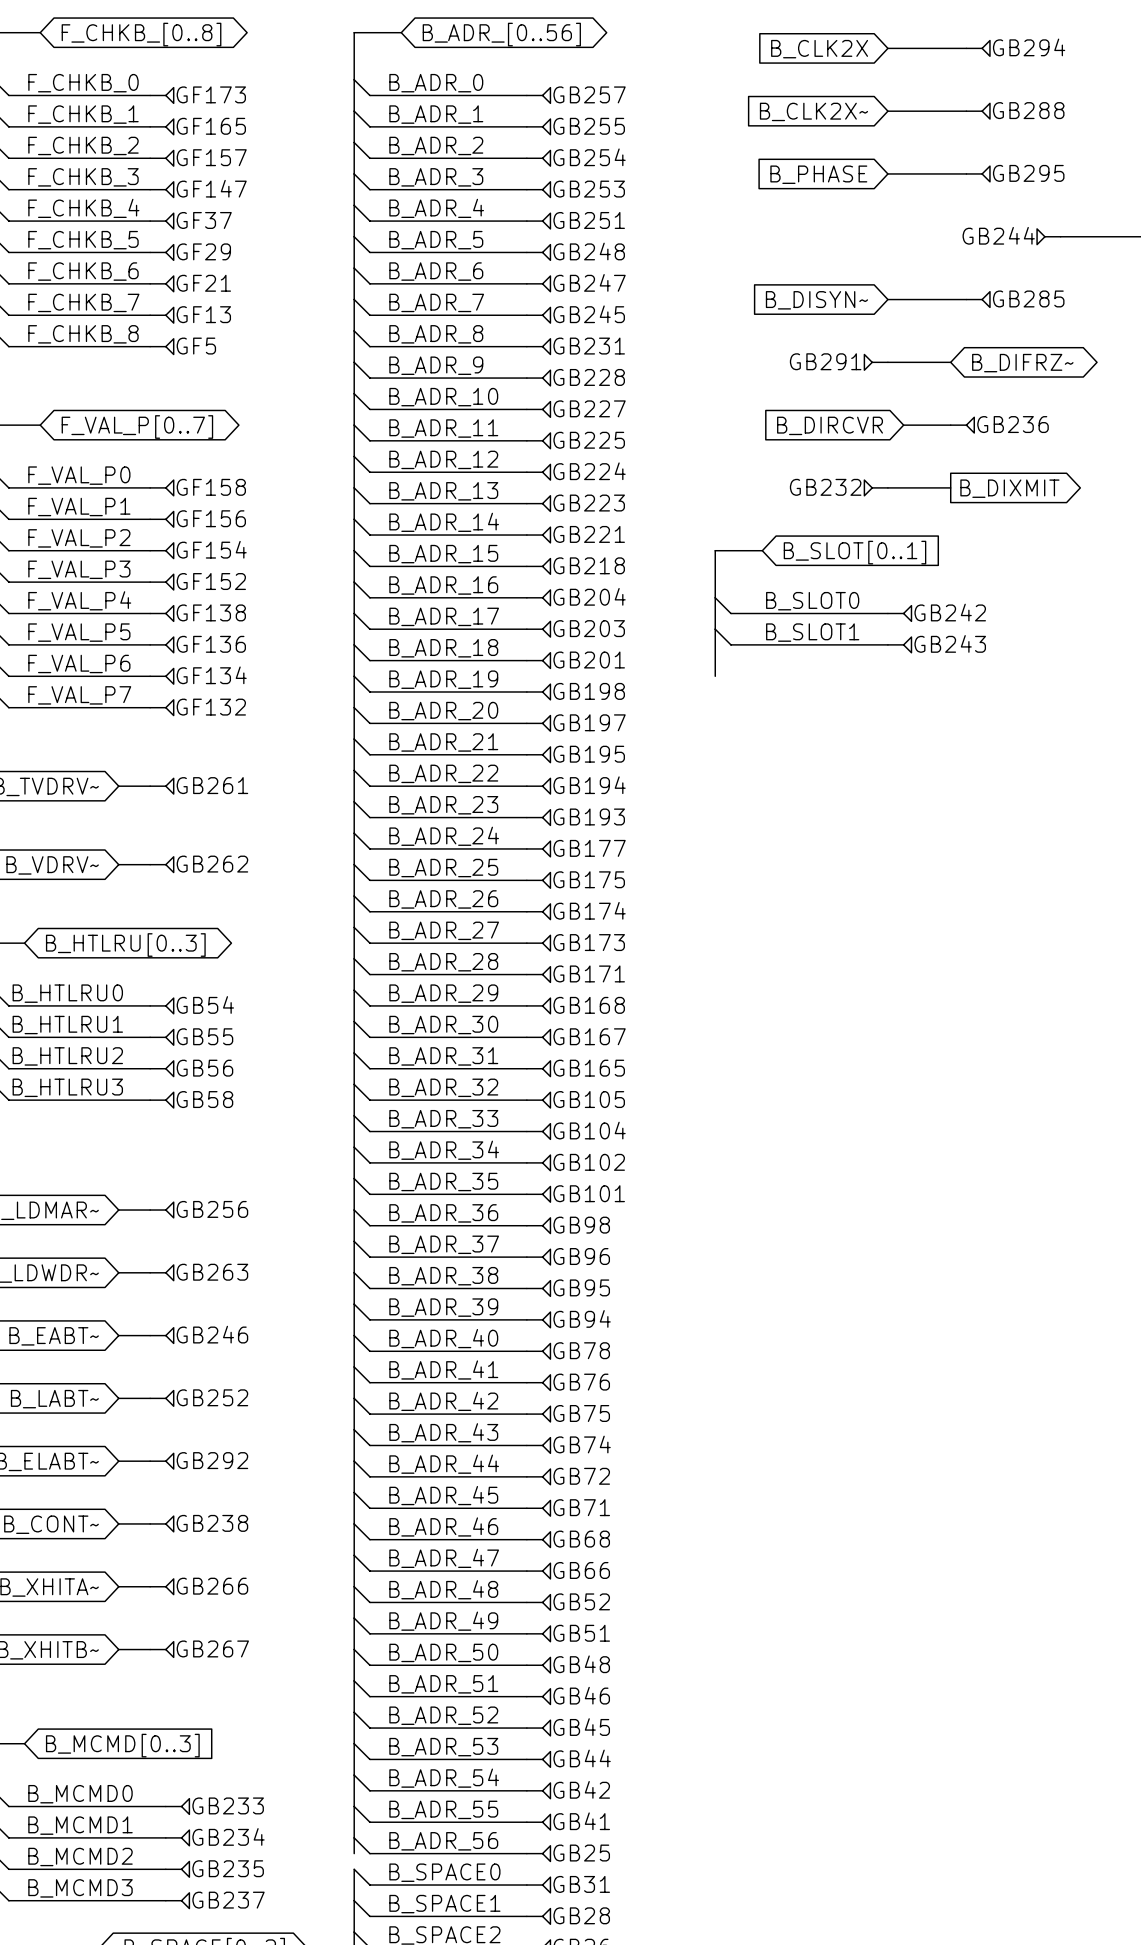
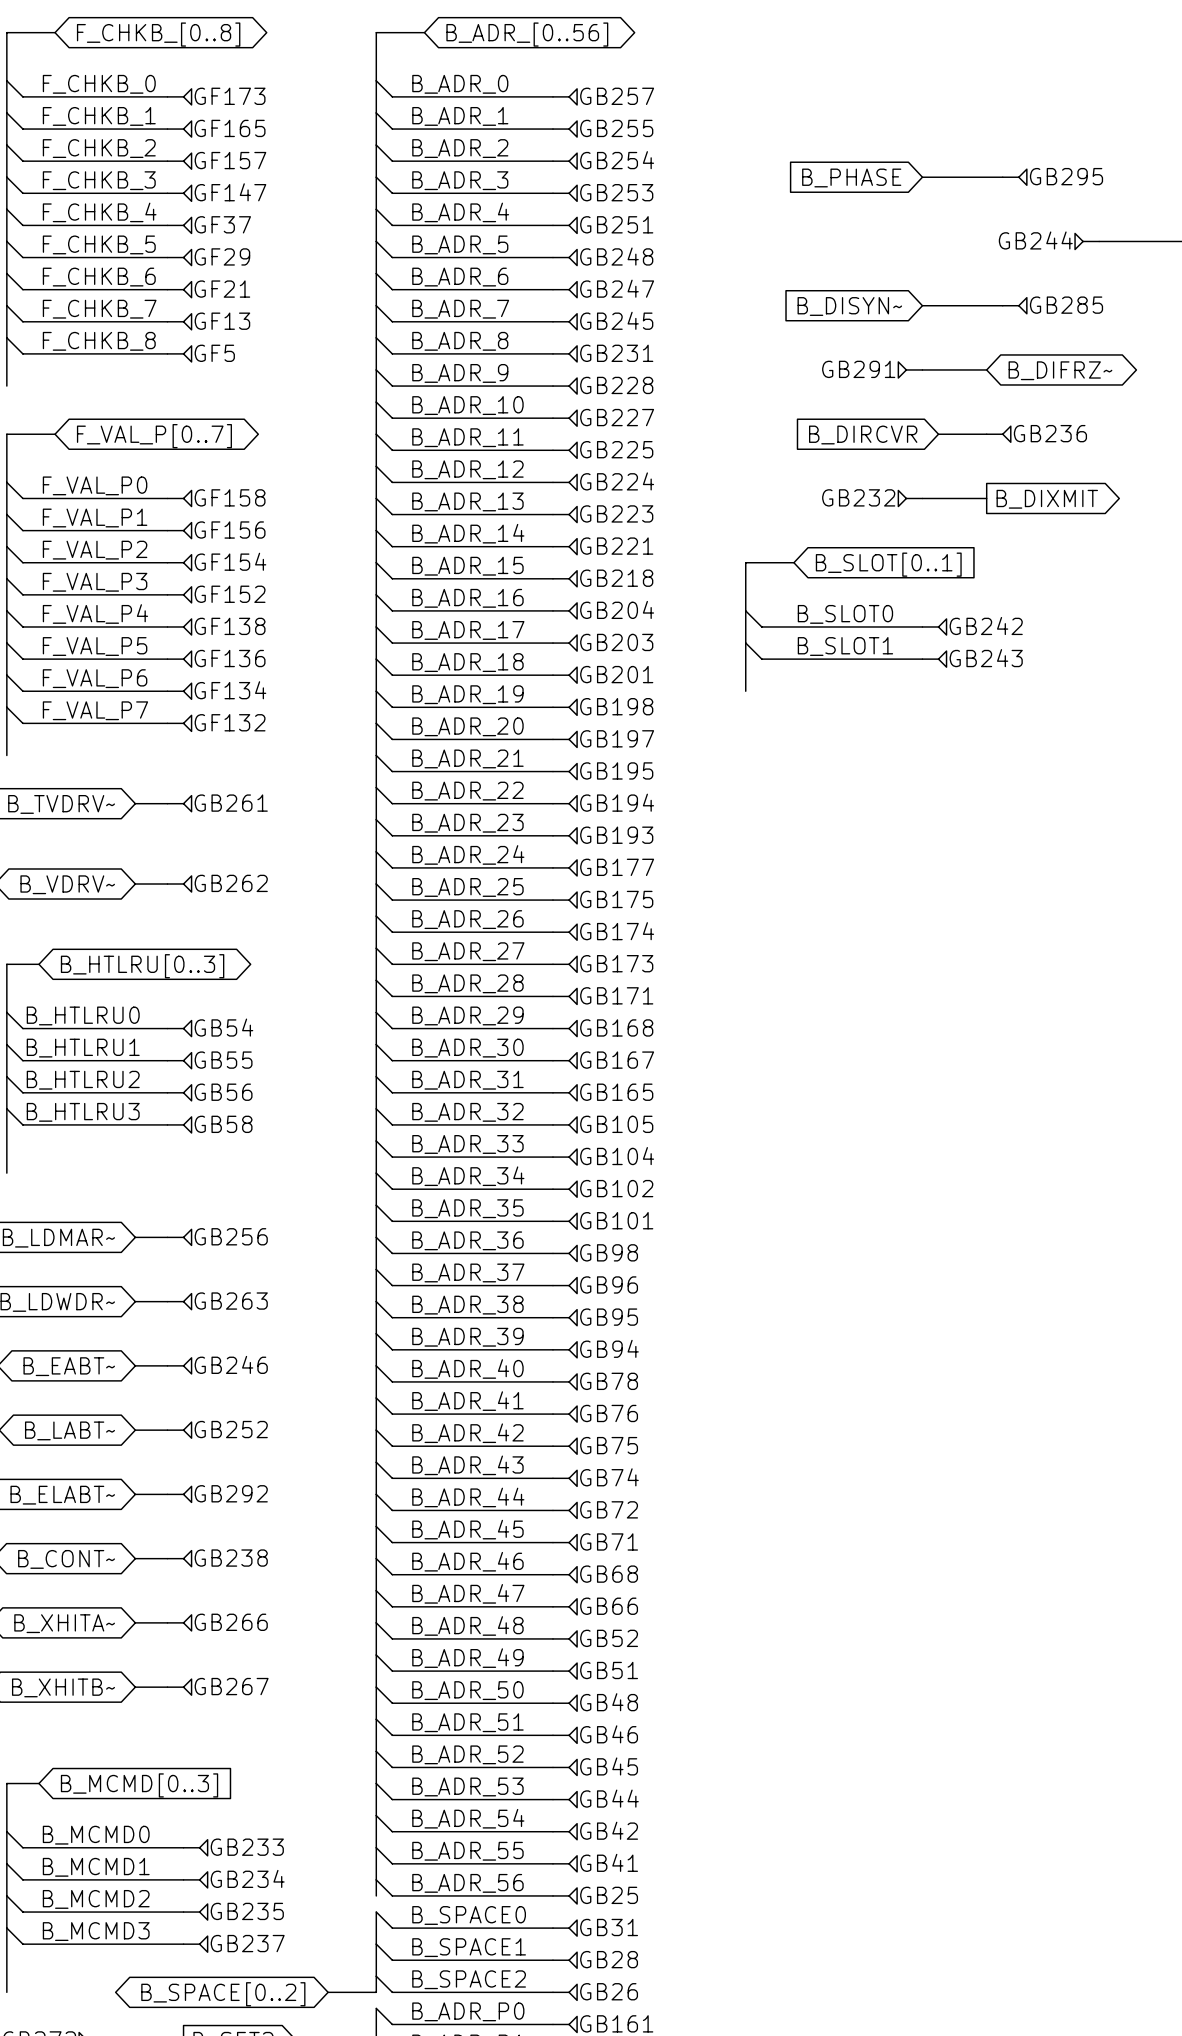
wire: (887, 48) (966, 48) -> none
GB294: (978, 48) -> none
global label: B_CLK2X (819, 49) -> none
global label: B_CLK2X~ (813, 111) -> none
wire: (887, 111) (966, 111) -> none
GB288: (978, 111) -> none

